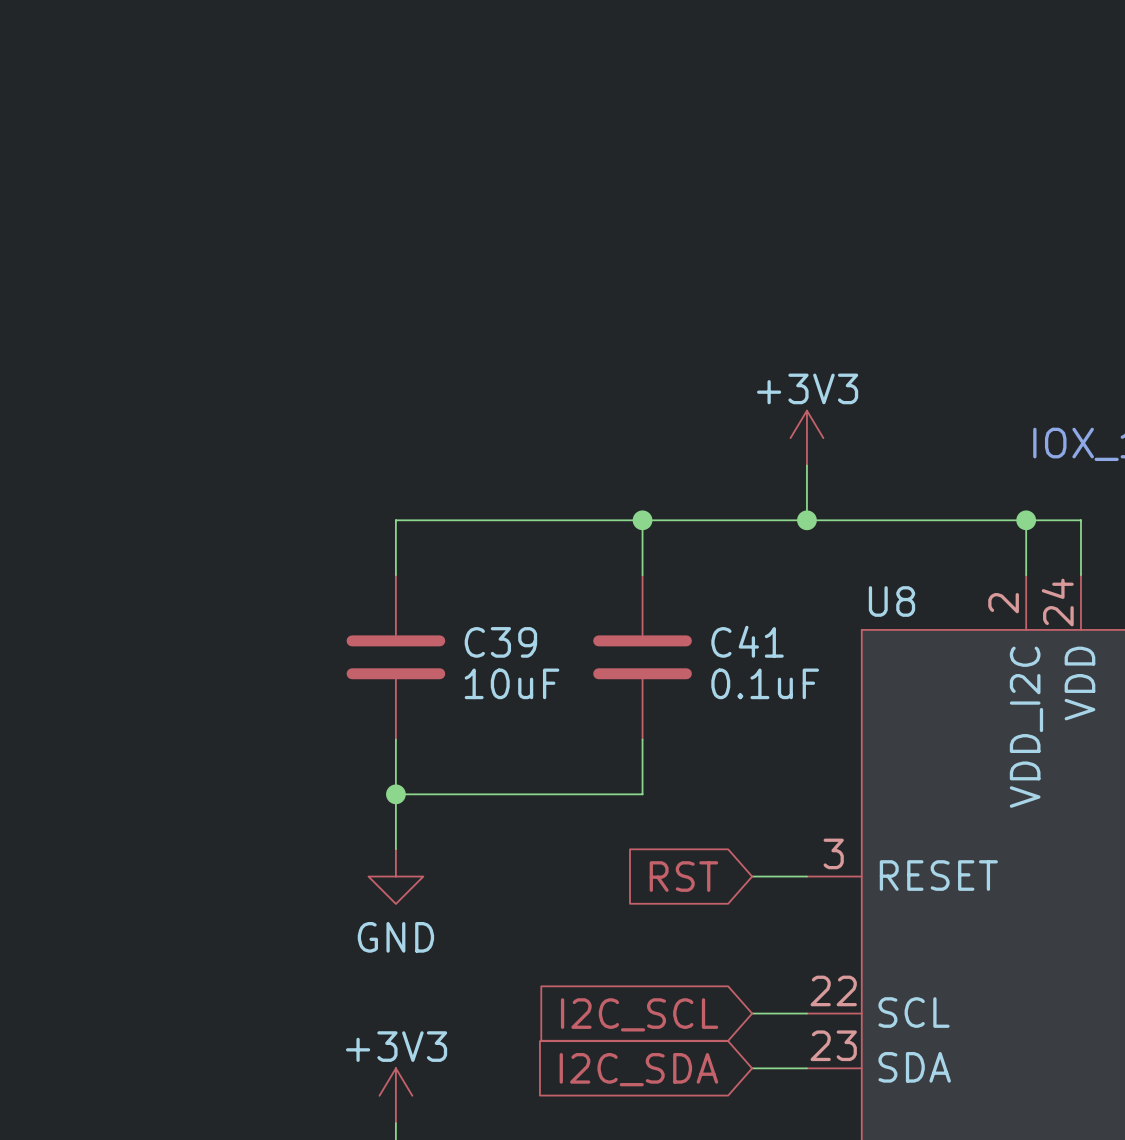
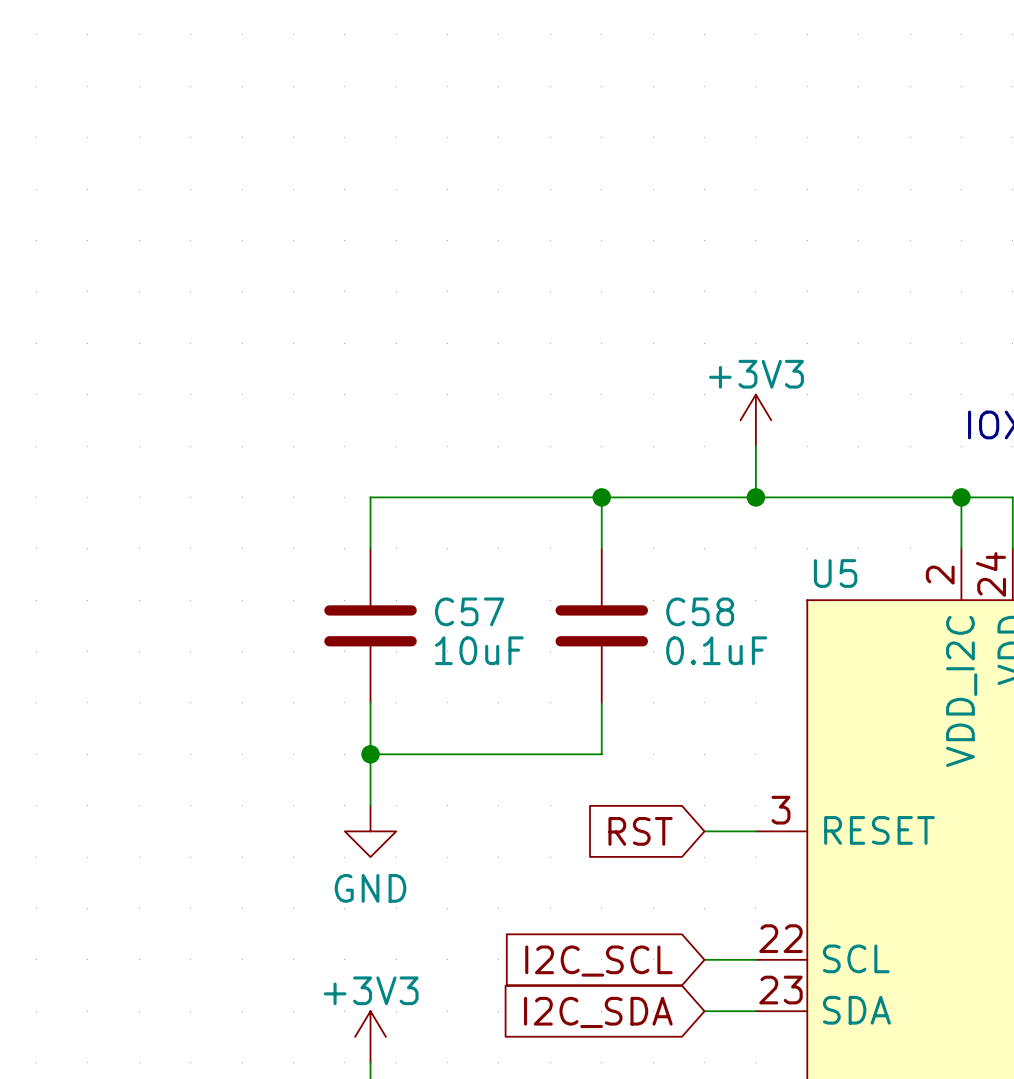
U8 name: U8 (891, 601) -> U5 (835, 573)
C41 name: C41 (747, 641) -> C58 (700, 611)
C39 name: C39 (500, 642) -> C57 (469, 611)

